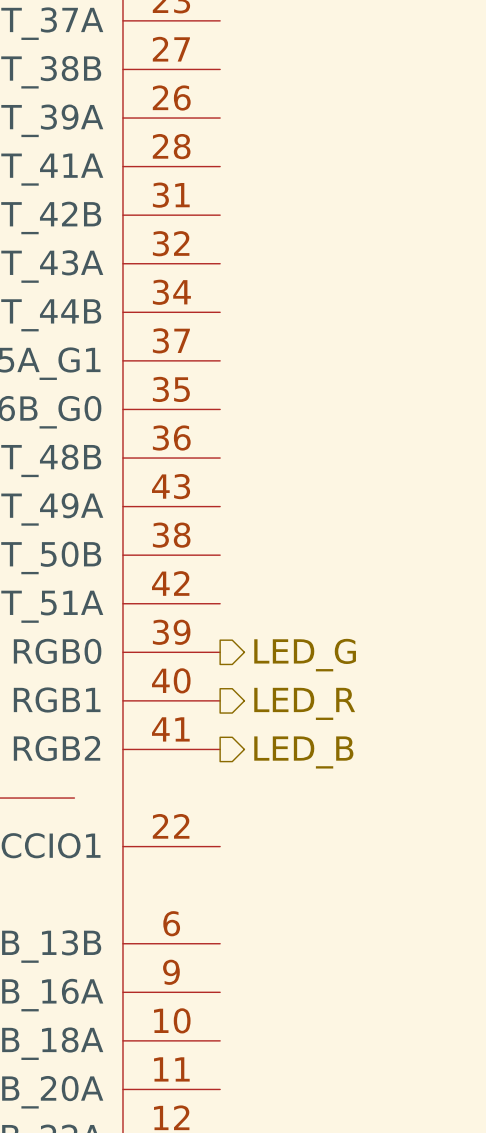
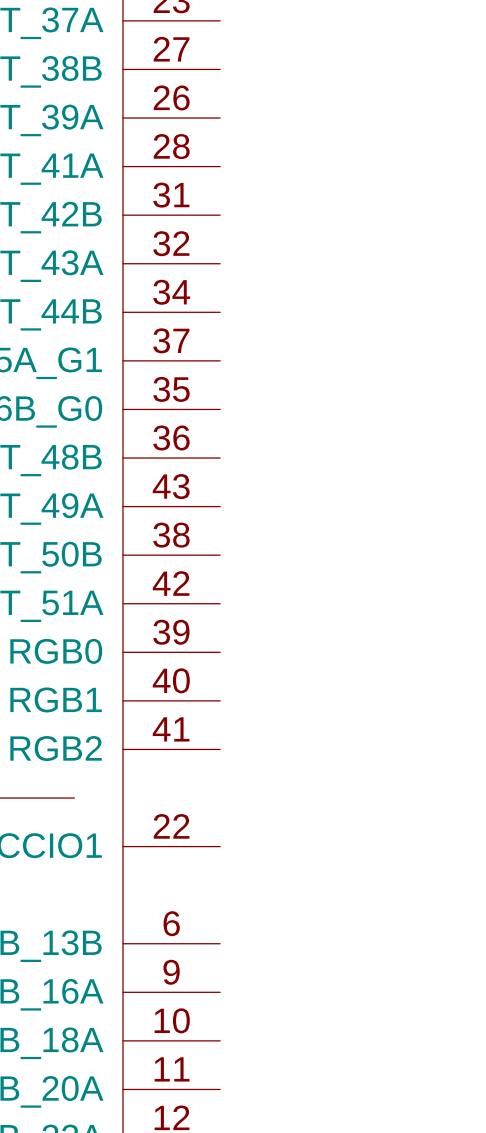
hierarchical label: LED_G (305, 655) -> none
hierarchical label: LED_R (304, 703) -> none
hierarchical label: LED_B (303, 752) -> none

